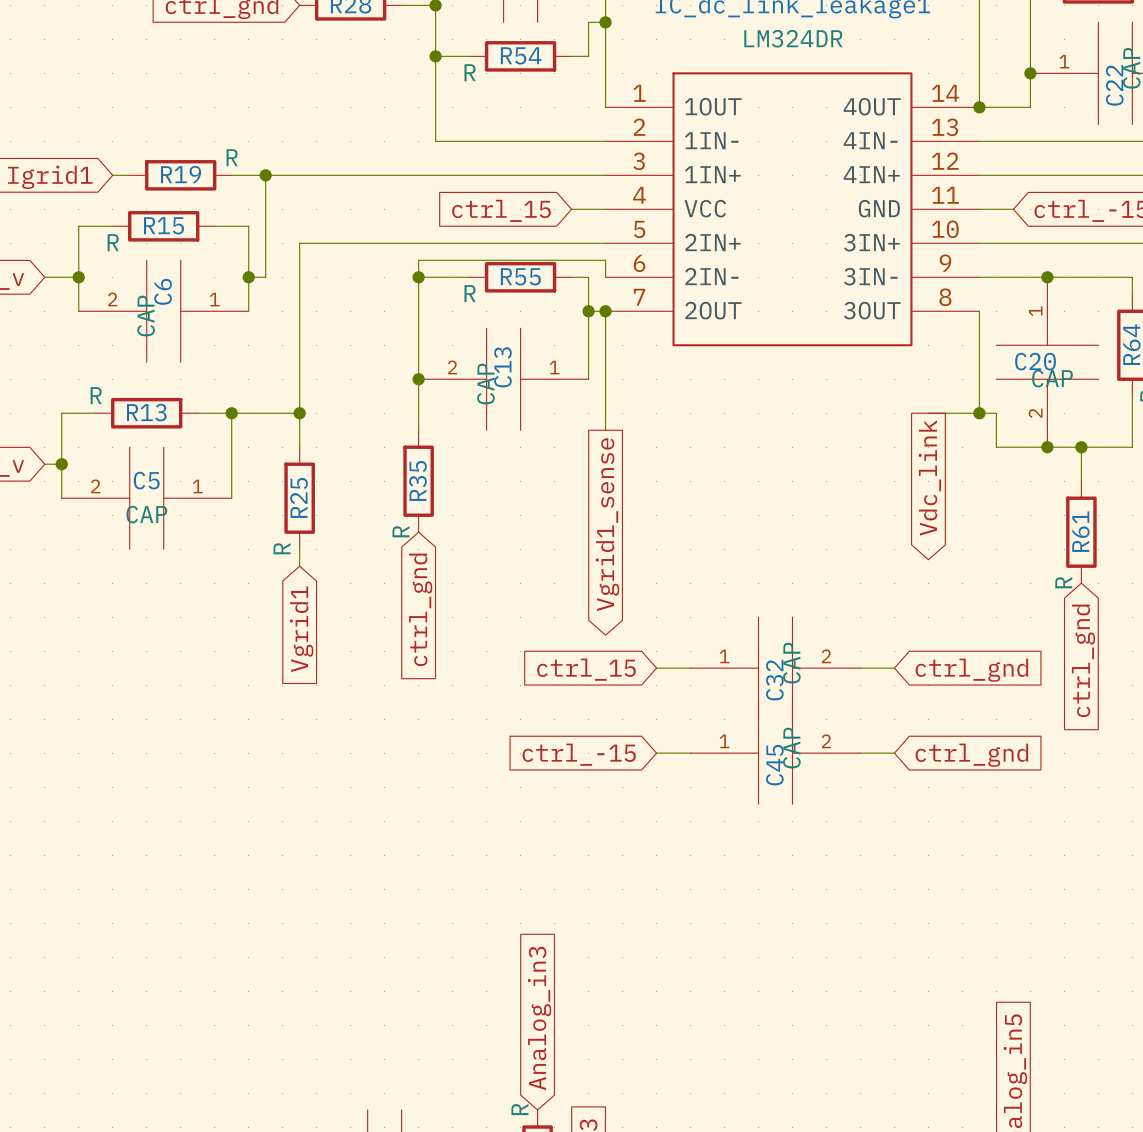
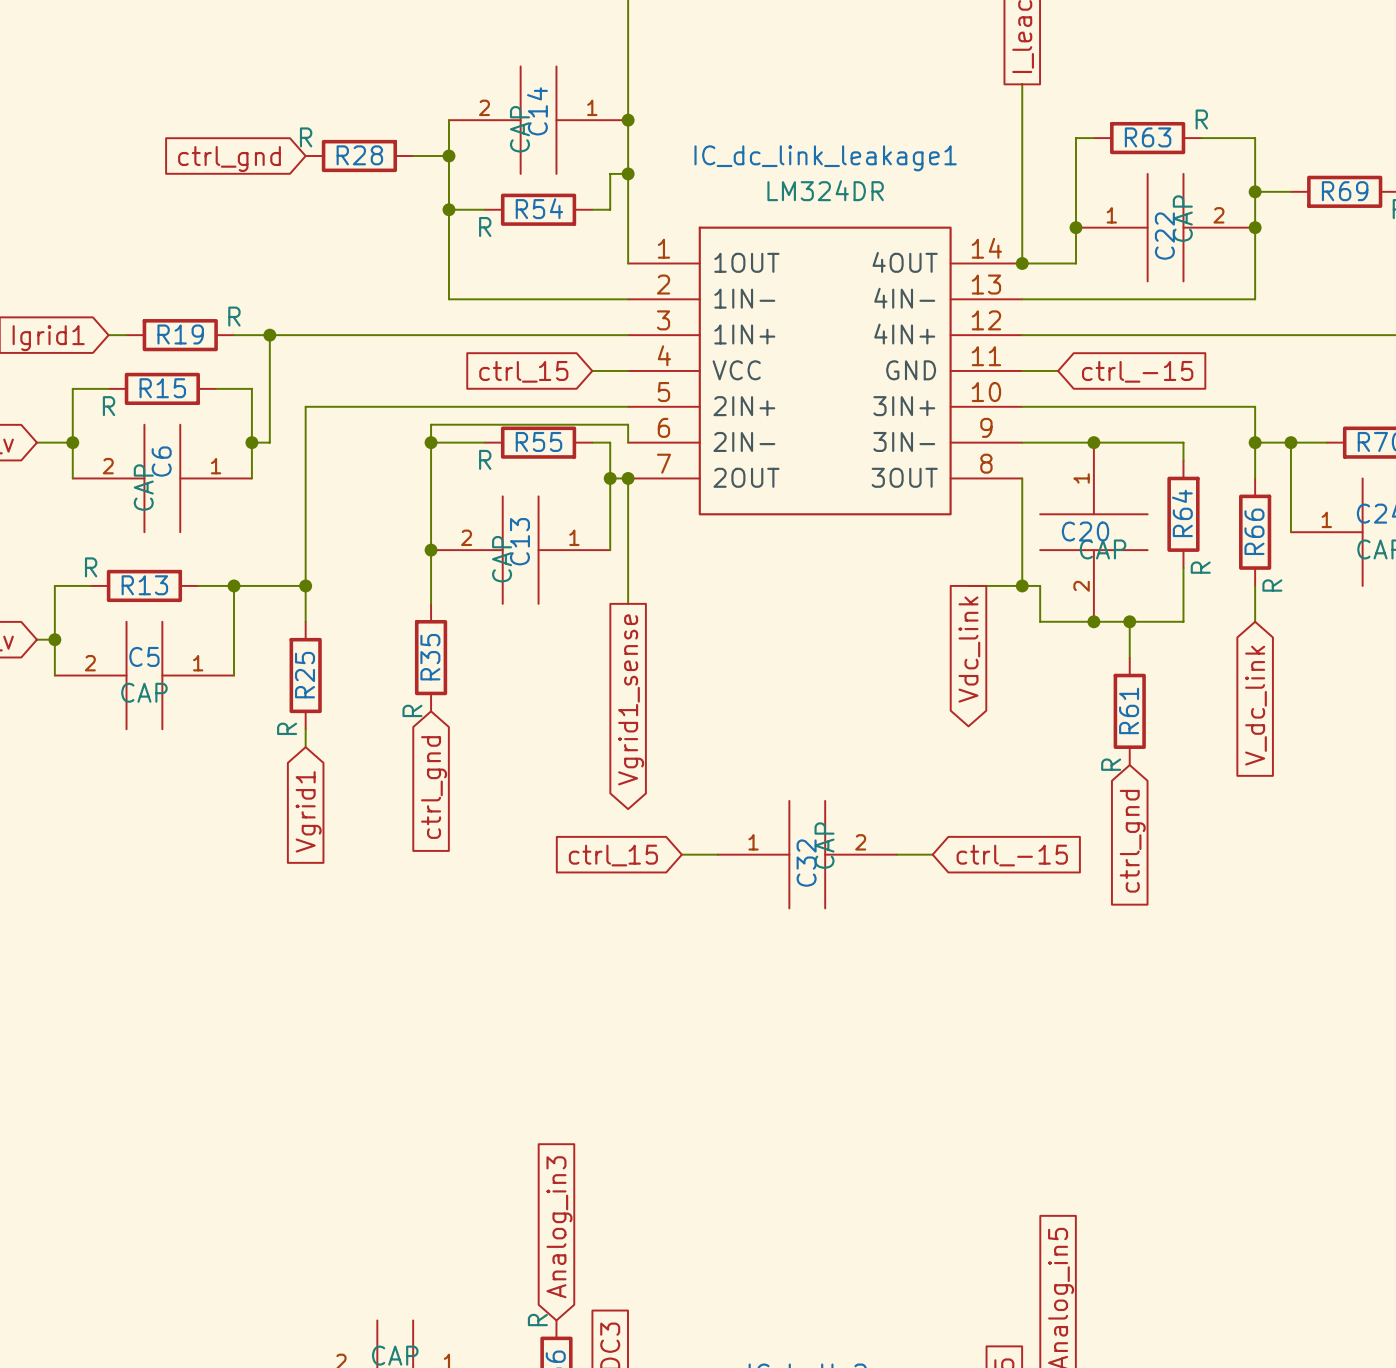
global label: ctrl_gnd (971, 670) -> ctrl_-15 (1012, 855)
wire: (656, 753) (690, 753) -> none
C45: CAP (775, 753) -> none
wire: (860, 753) (894, 753) -> none
global label: ctrl_-15 (579, 754) -> none
global label: ctrl_gnd (971, 755) -> none

